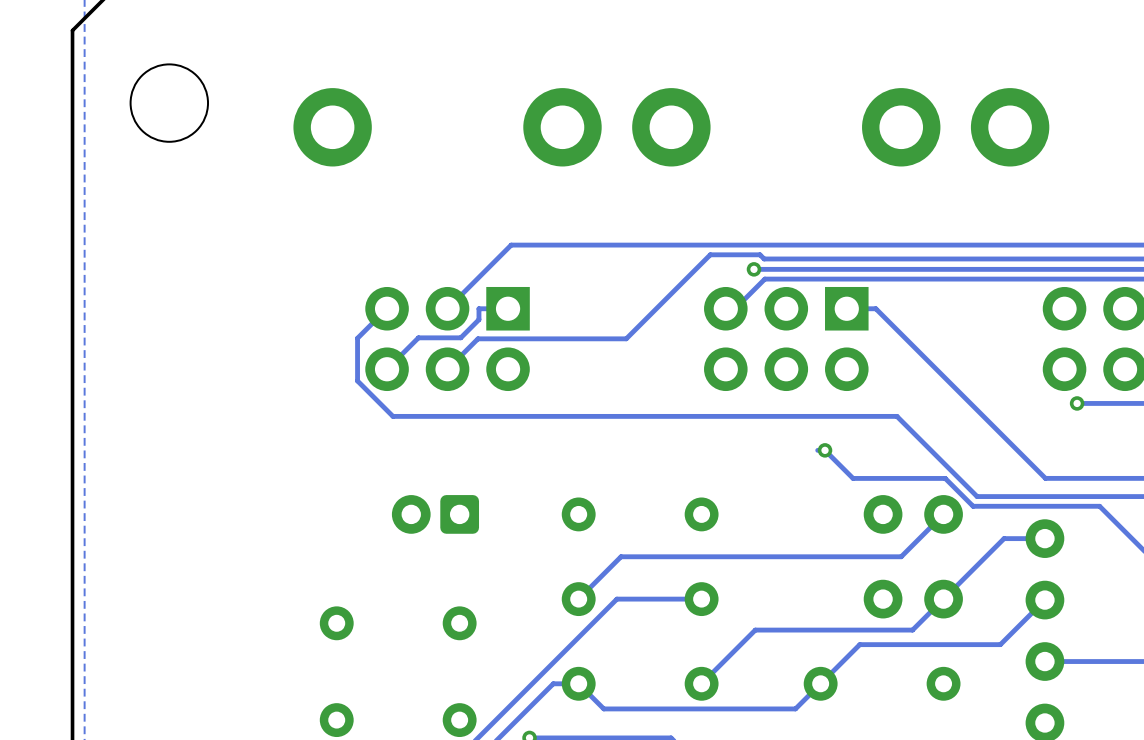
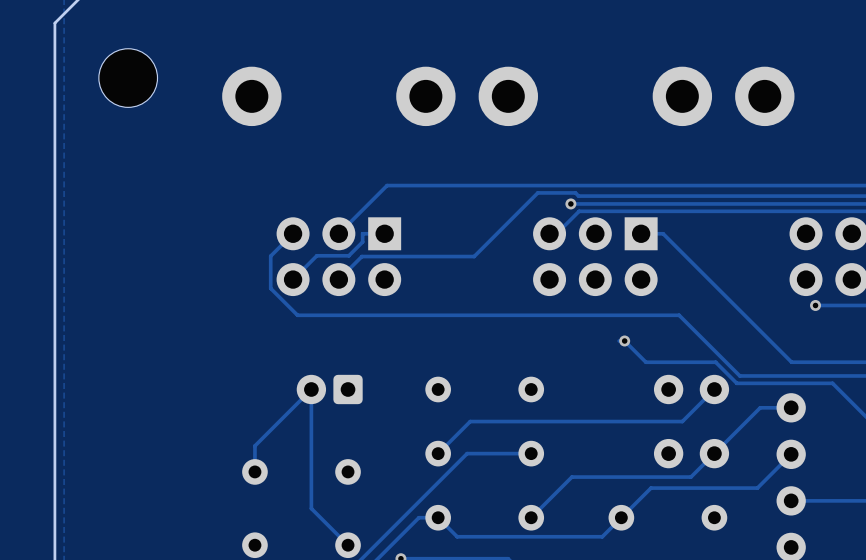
track: none -> (254, 471) (254, 445) (311, 389) (311, 508) (348, 545)

